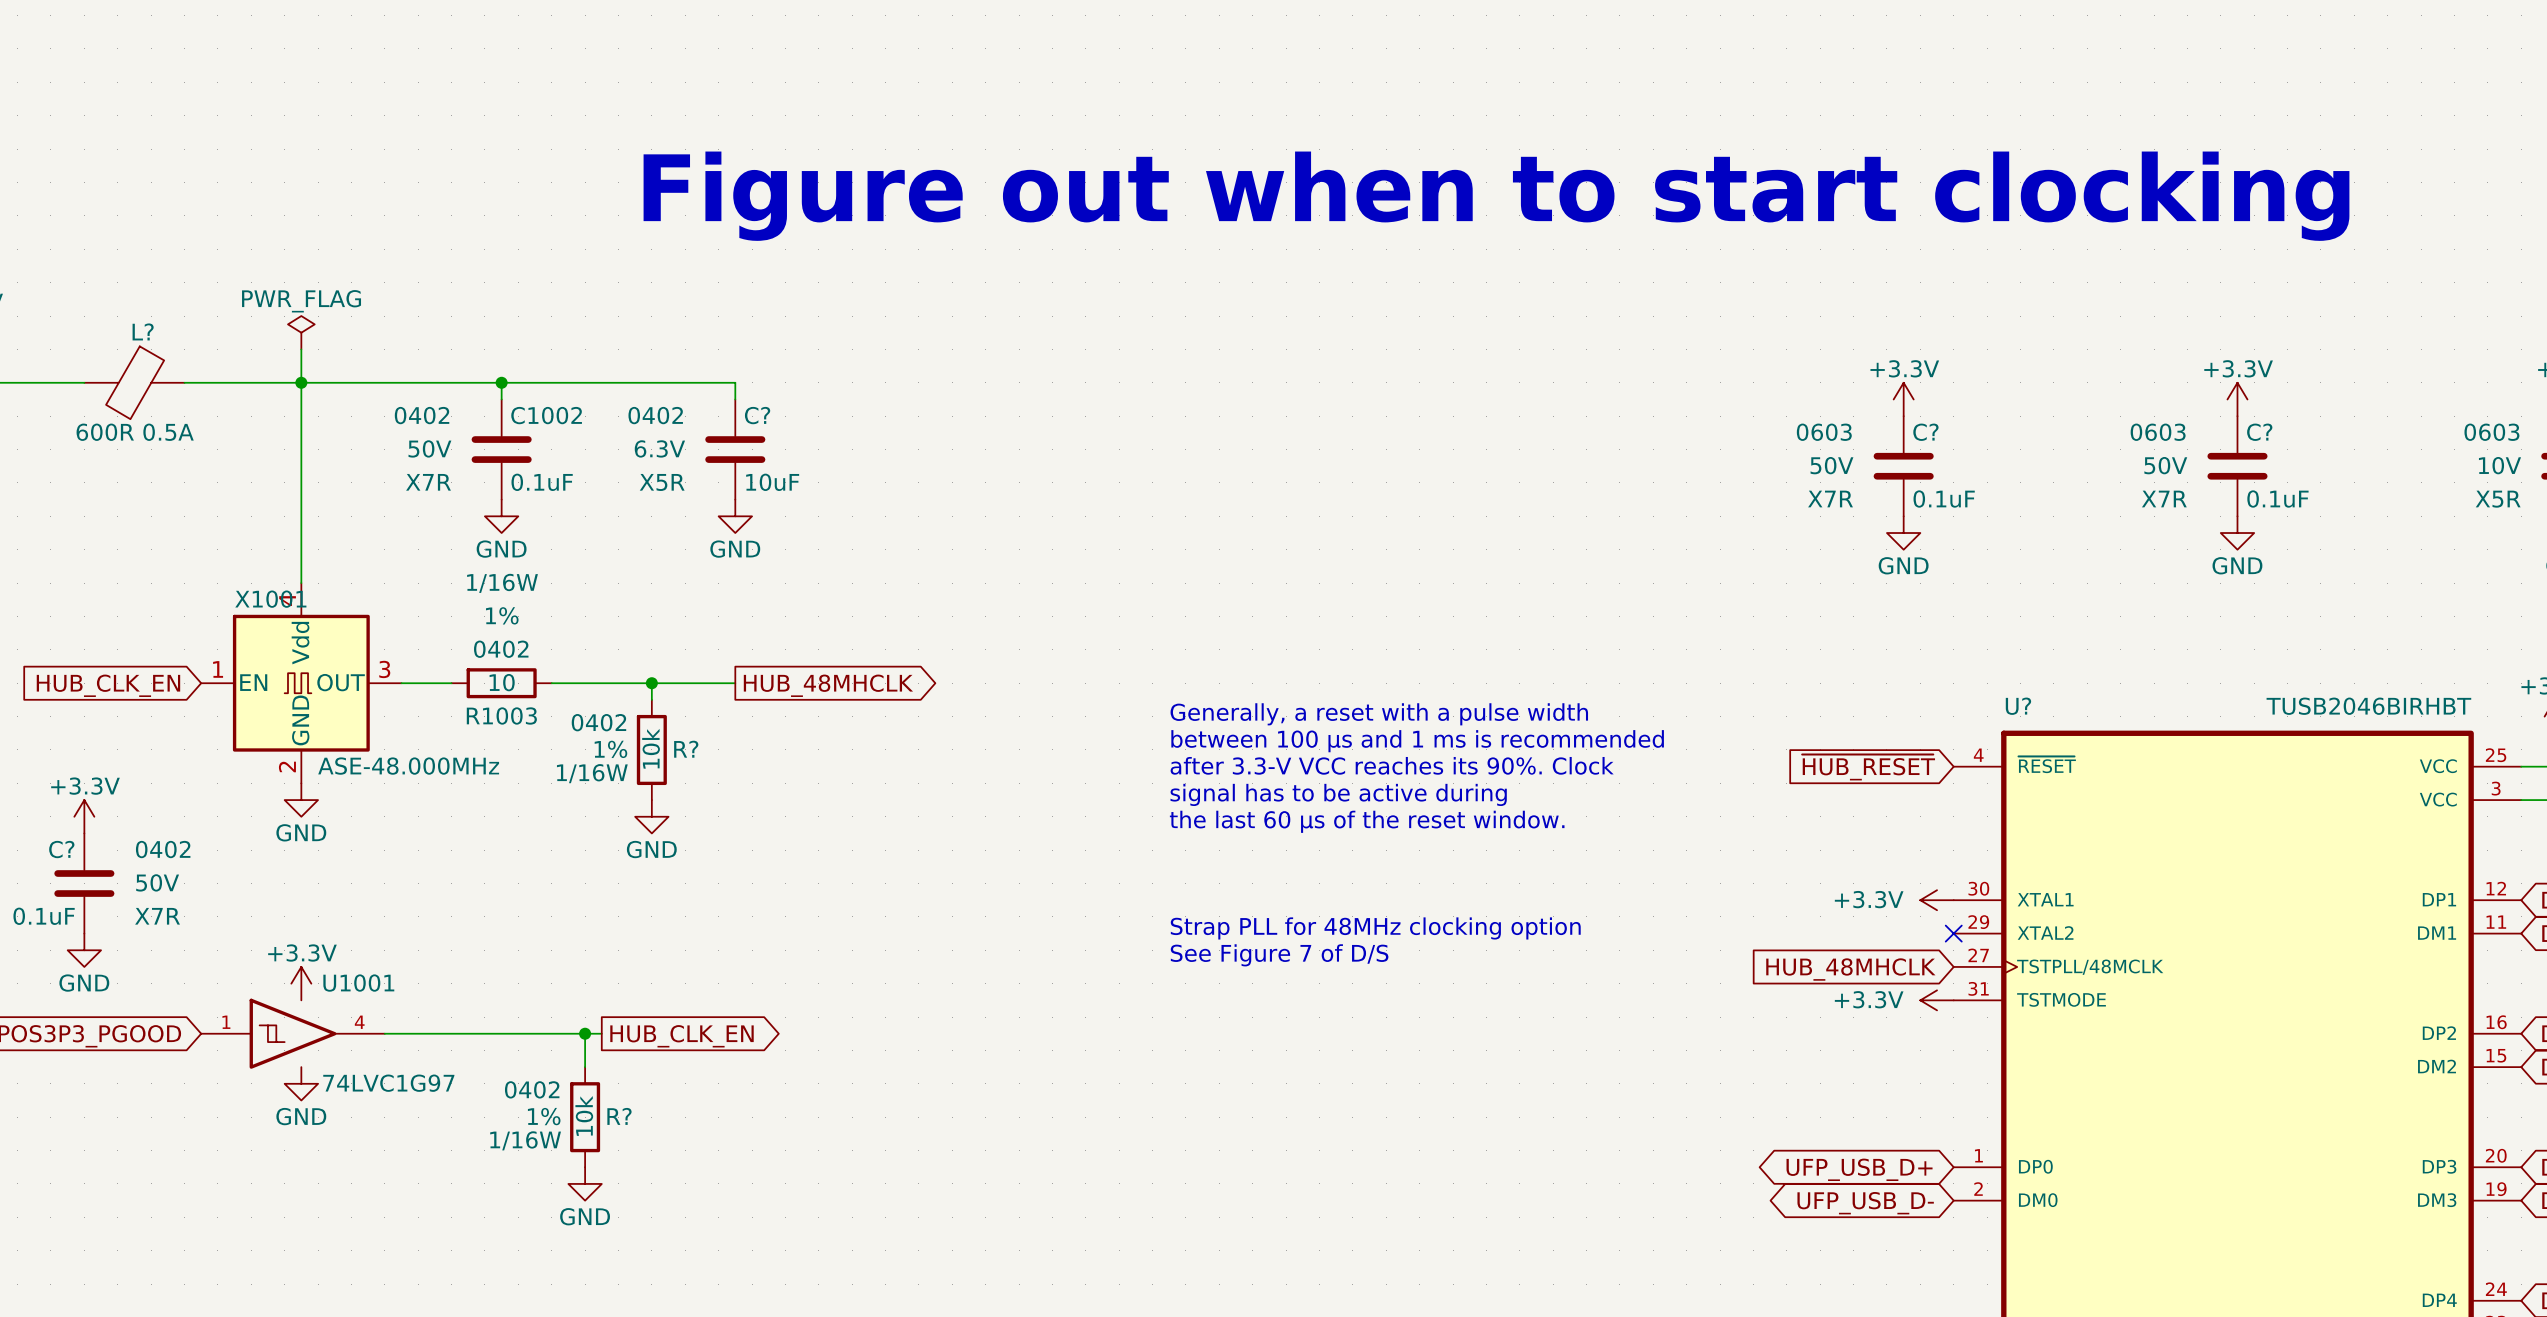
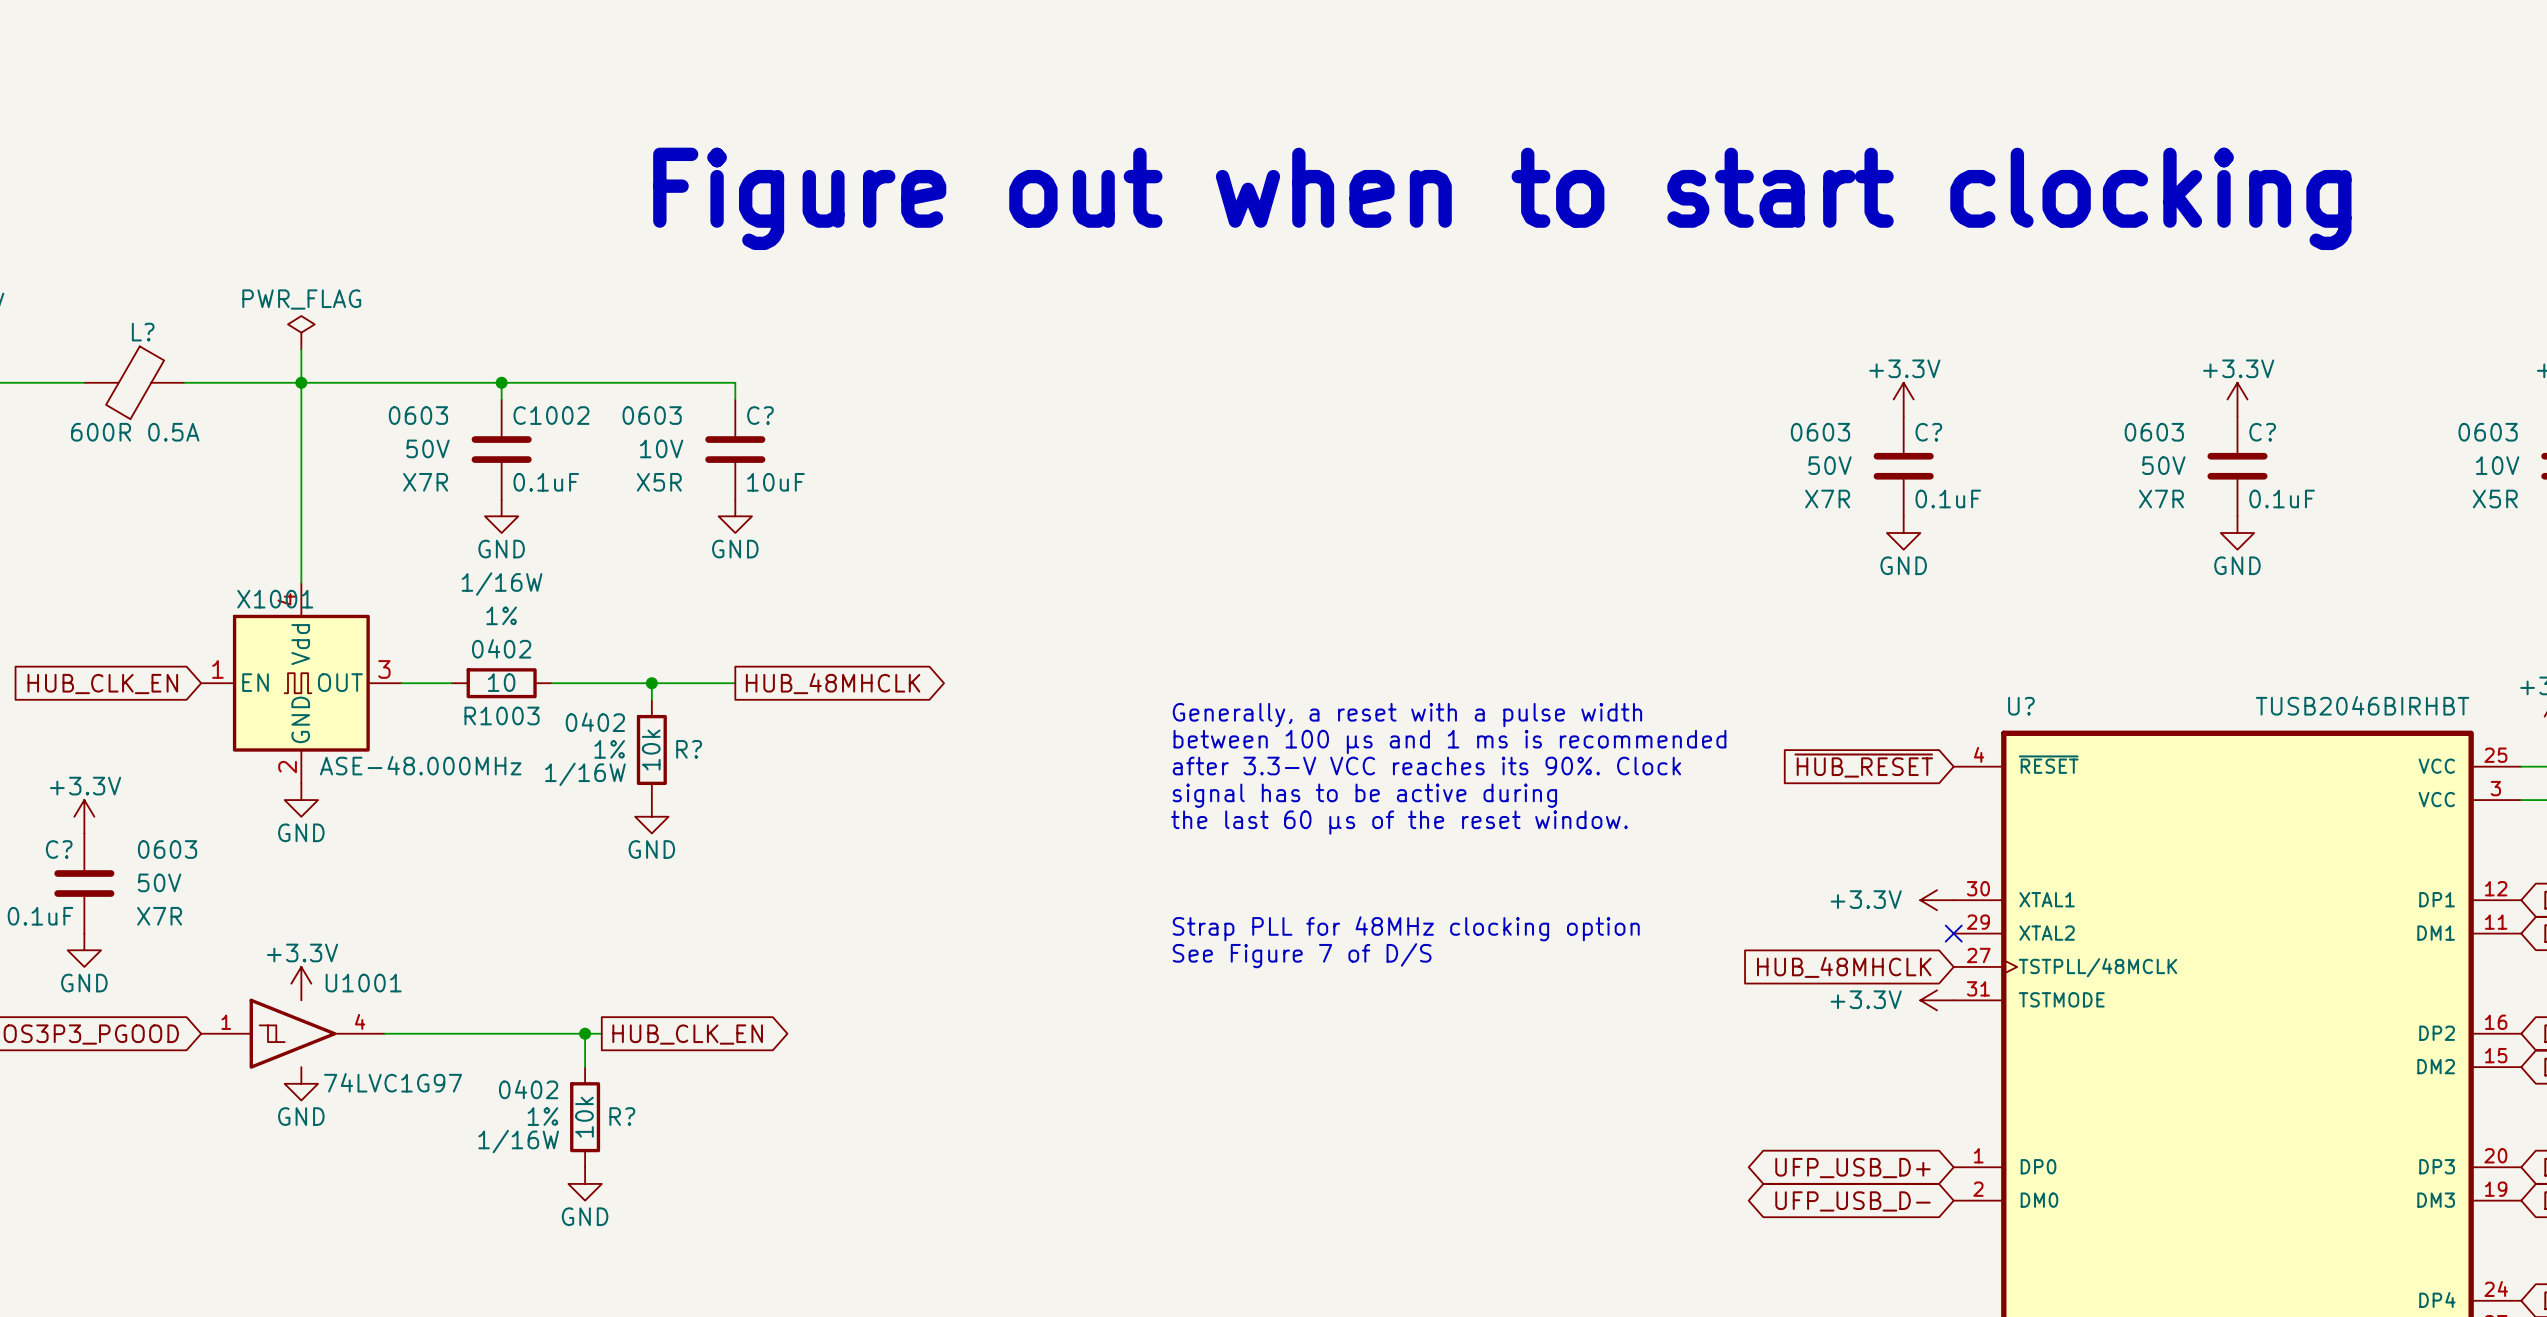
C1002 text: 0402 (422, 415) -> 0603 (418, 415)
C? text: 0402 (655, 415) -> 0603 (652, 415)
C? text: 6.3V (659, 448) -> 10V (661, 448)
C? text: 0402 (163, 849) -> 0603 (167, 849)

